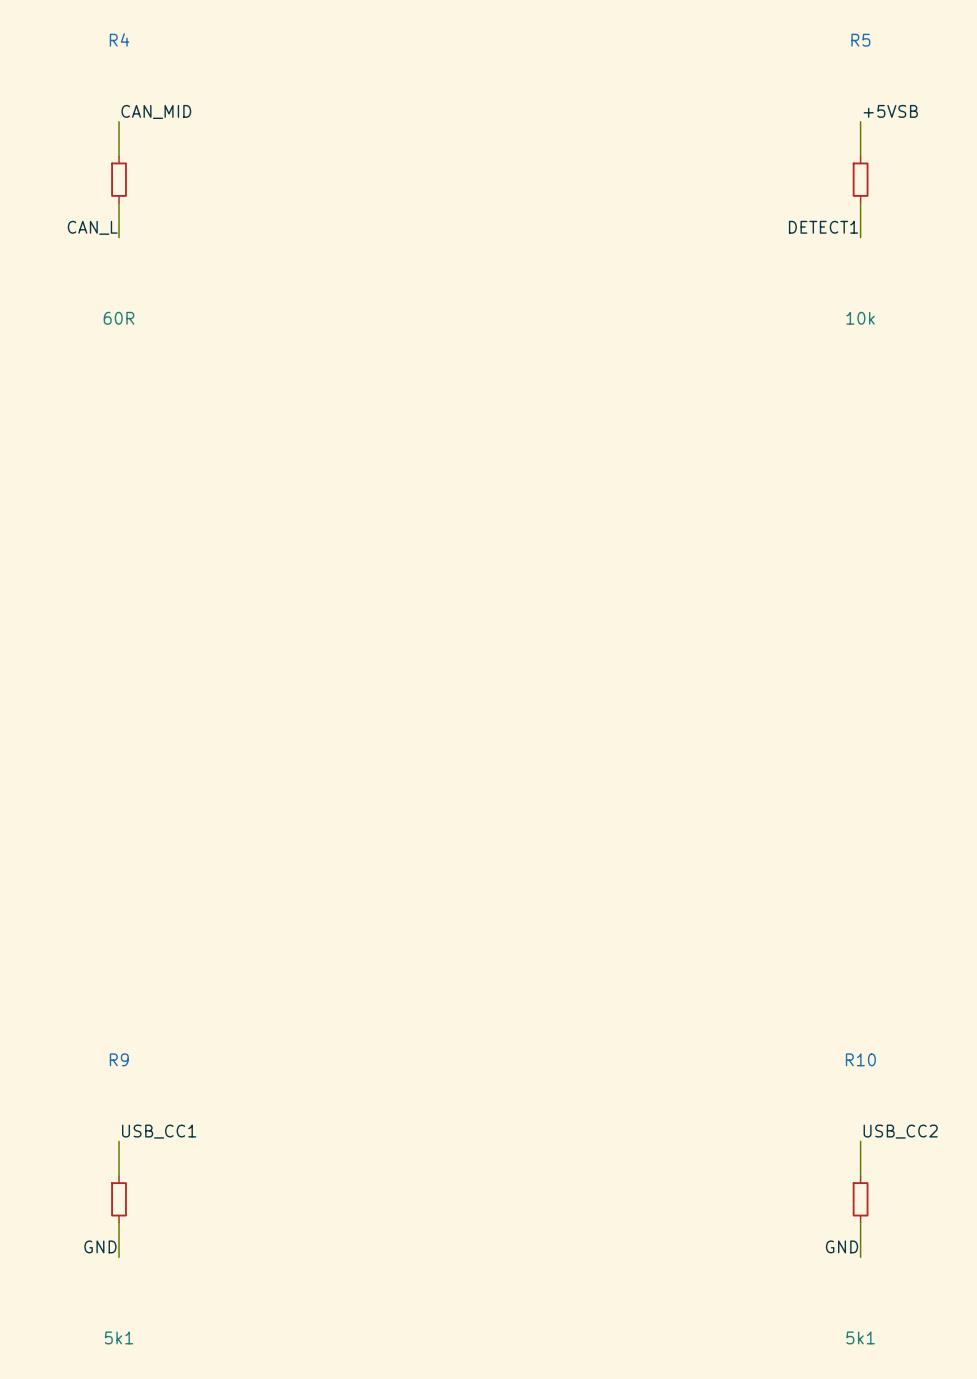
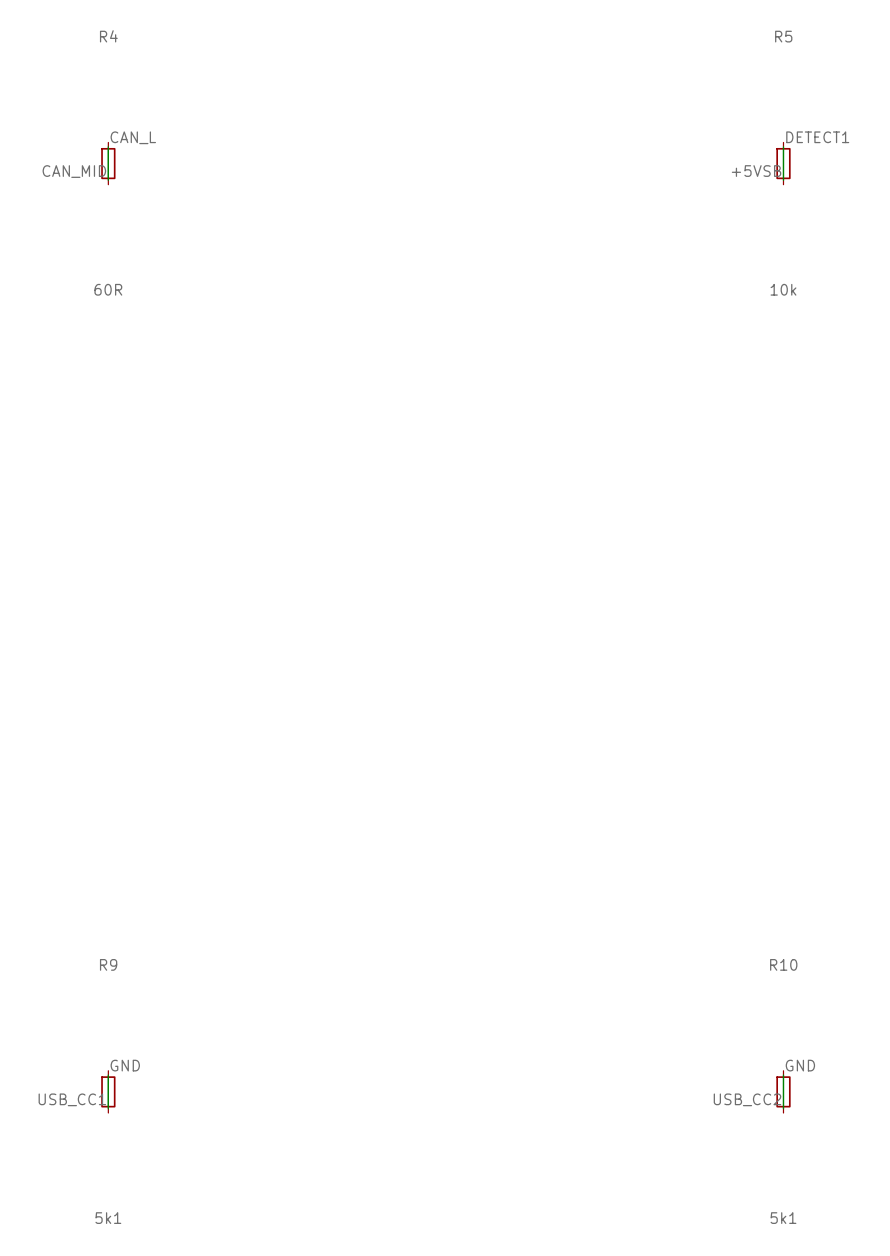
label position: CAN_MID (156, 111) -> CAN_MID (74, 171)
label position: +5VSB (890, 111) -> +5VSB (756, 171)
wire: (119, 121) (119, 156) -> none
wire: (860, 121) (860, 156) -> none
wire: none -> (108, 146) (108, 180)
wire: none -> (783, 146) (783, 180)
wire: (119, 202) (119, 237) -> none
wire: (860, 202) (860, 237) -> none
label position: CAN_L (92, 227) -> CAN_L (133, 137)
label position: DETECT1 (823, 227) -> DETECT1 (817, 137)
label position: USB_CC1 (159, 1131) -> USB_CC1 (72, 1099)
label position: USB_CC2 (900, 1131) -> USB_CC2 (747, 1099)
wire: (119, 1141) (119, 1176) -> none
wire: (860, 1141) (860, 1176) -> none
wire: none -> (108, 1075) (108, 1108)
wire: none -> (783, 1075) (783, 1108)
wire: (119, 1222) (119, 1257) -> none
wire: (860, 1222) (860, 1257) -> none
label position: GND (100, 1246) -> GND (125, 1065)
label position: GND (842, 1246) -> GND (800, 1065)

